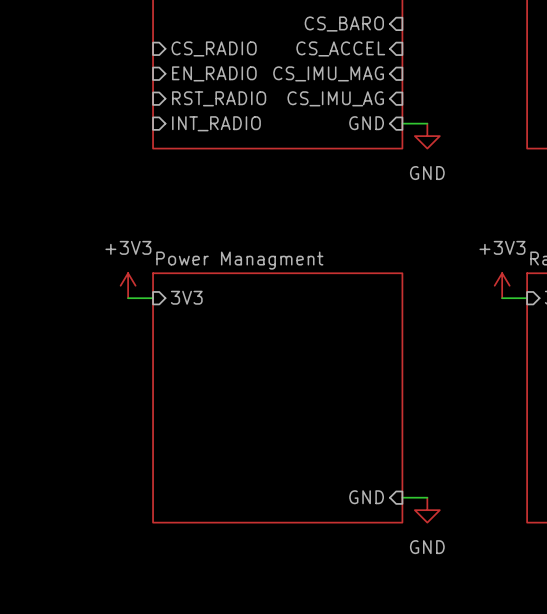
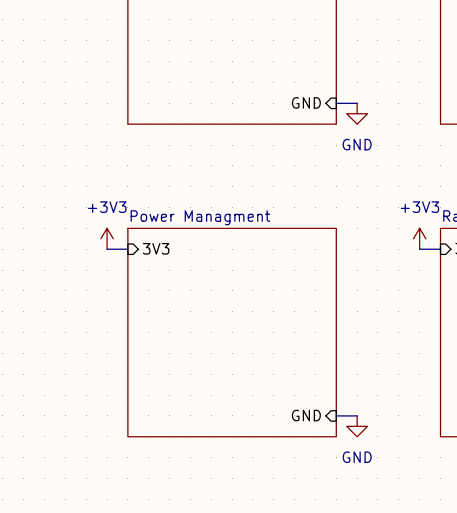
sheet pin: CS_BARO (344, 24) -> none
sheet pin: CS_RADIO (214, 48) -> none
sheet pin: CS_ACCEL (340, 48) -> none
sheet pin: EN_RADIO (214, 73) -> none
sheet pin: CS_IMU_MAG (328, 73) -> none
sheet pin: RST_RADIO (219, 98) -> none
sheet pin: CS_IMU_AG (335, 98) -> none
sheet pin: INT_RADIO (216, 123) -> none

